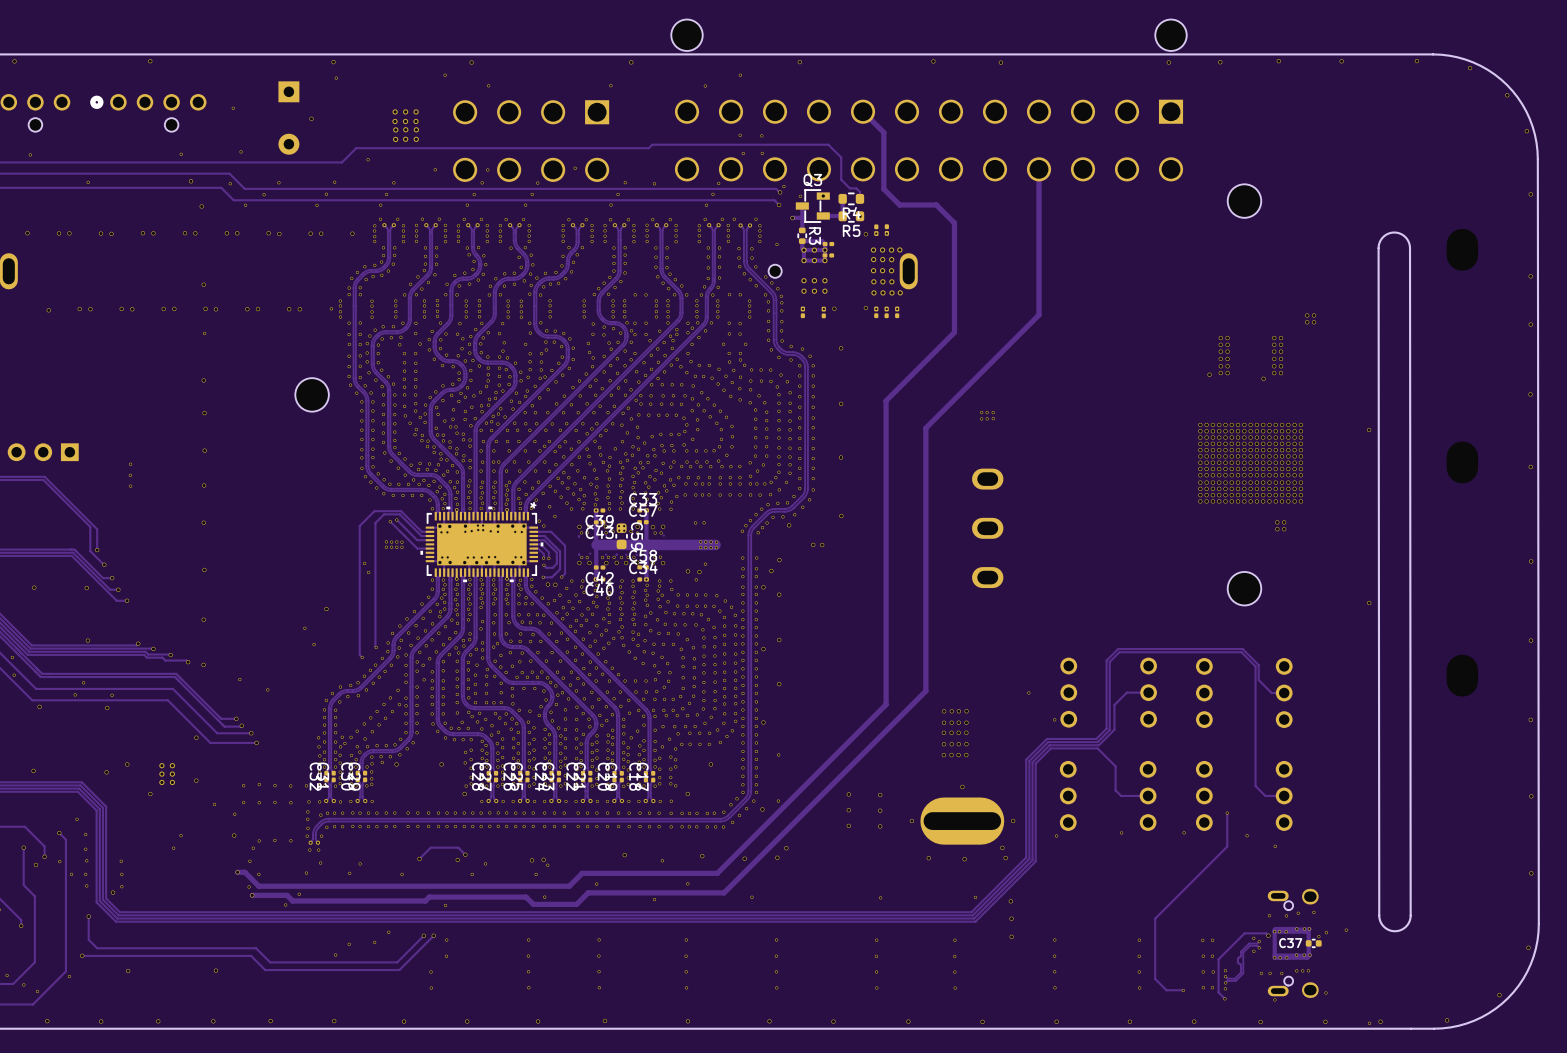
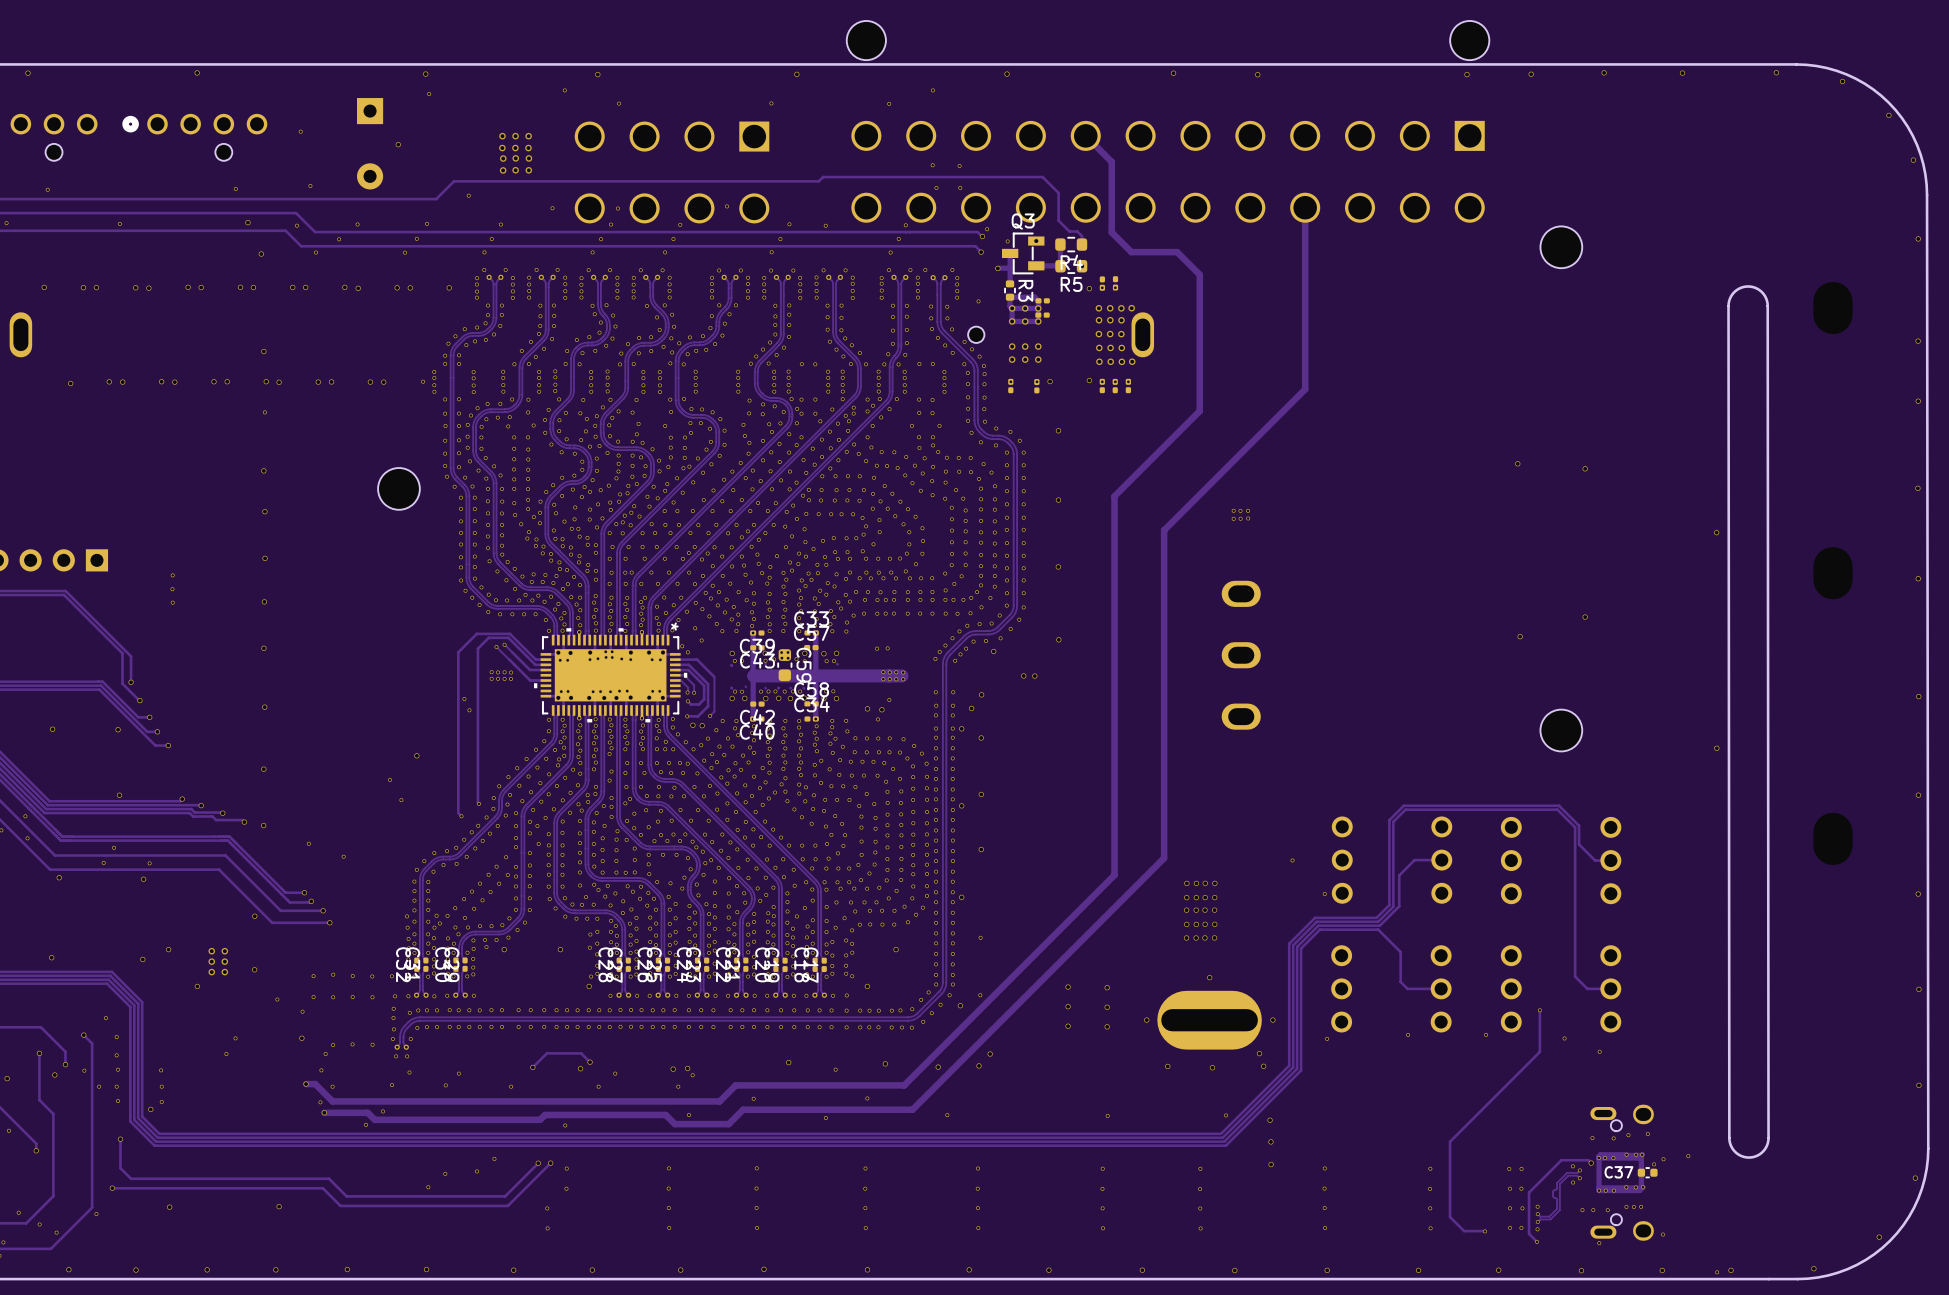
via: (1307, 315) -> none
via: (1314, 315) -> none
via: (1307, 322) -> none
via: (1314, 322) -> none
via: (1220, 338) -> none
via: (1227, 338) -> none
via: (1274, 338) -> none
via: (1281, 338) -> none
via: (1220, 344) -> none
via: (1227, 344) -> none
via: (1274, 344) -> none
via: (1281, 344) -> none
via: (1220, 351) -> none
via: (1227, 351) -> none
via: (1274, 351) -> none
via: (1281, 351) -> none
via: (1220, 358) -> none
via: (1227, 358) -> none
via: (1274, 358) -> none
via: (1281, 358) -> none
via: (1220, 366) -> none
via: (1227, 366) -> none
via: (1274, 366) -> none
via: (1281, 366) -> none
via: (1220, 373) -> none
via: (1227, 373) -> none
via: (1274, 373) -> none
via: (1281, 373) -> none
via: (1200, 424) -> none
via: (1206, 424) -> none
via: (1212, 424) -> none
via: (1219, 424) -> none
via: (1225, 424) -> none
via: (1231, 424) -> none
via: (1238, 424) -> none
via: (1244, 424) -> none
via: (1250, 424) -> none
via: (1256, 424) -> none
via: (1263, 424) -> none
via: (1269, 424) -> none
via: (1275, 424) -> none
via: (1282, 424) -> none
via: (1288, 424) -> none
via: (1294, 424) -> none
via: (1300, 424) -> none
via: (1200, 431) -> none
via: (1206, 431) -> none
via: (1212, 431) -> none
via: (1219, 431) -> none
via: (1225, 431) -> none
via: (1231, 431) -> none
via: (1238, 431) -> none
via: (1244, 431) -> none
via: (1250, 431) -> none
via: (1256, 431) -> none
via: (1263, 431) -> none
via: (1269, 431) -> none
via: (1275, 431) -> none
via: (1282, 431) -> none
via: (1288, 431) -> none
via: (1294, 431) -> none
via: (1300, 431) -> none
via: (1200, 437) -> none
via: (1206, 437) -> none
via: (1212, 437) -> none
via: (1219, 437) -> none
via: (1225, 437) -> none
via: (1231, 437) -> none
via: (1238, 437) -> none
via: (1244, 437) -> none
via: (1250, 437) -> none
via: (1256, 437) -> none
via: (1263, 437) -> none
via: (1269, 437) -> none
via: (1275, 437) -> none
via: (1282, 437) -> none
via: (1288, 437) -> none
via: (1294, 437) -> none
via: (1300, 437) -> none
via: (1200, 443) -> none
via: (1206, 443) -> none
via: (1212, 443) -> none
via: (1219, 443) -> none
via: (1225, 443) -> none
via: (1231, 443) -> none
via: (1238, 443) -> none
via: (1244, 443) -> none
via: (1250, 443) -> none
via: (1256, 443) -> none
via: (1263, 443) -> none
via: (1269, 443) -> none
via: (1275, 443) -> none
via: (1282, 443) -> none
via: (1288, 443) -> none
via: (1294, 443) -> none
via: (1300, 443) -> none
via: (1200, 450) -> none
via: (1206, 450) -> none
via: (1212, 450) -> none
via: (1219, 450) -> none
via: (1225, 450) -> none
via: (1231, 450) -> none
via: (1238, 450) -> none
via: (1244, 450) -> none
via: (1250, 450) -> none
via: (1256, 450) -> none
via: (1263, 450) -> none
via: (1269, 450) -> none
via: (1275, 450) -> none
via: (1282, 450) -> none
via: (1288, 450) -> none
via: (1294, 450) -> none
via: (1300, 450) -> none
via: (1200, 456) -> none
via: (1206, 456) -> none
via: (1212, 456) -> none
via: (1219, 456) -> none
via: (1225, 456) -> none
via: (1231, 456) -> none
via: (1238, 456) -> none
via: (1244, 456) -> none
via: (1250, 456) -> none
via: (1256, 456) -> none
via: (1263, 456) -> none
via: (1269, 456) -> none
via: (1275, 456) -> none
via: (1282, 456) -> none
via: (1288, 456) -> none
via: (1294, 456) -> none
via: (1300, 456) -> none
via: (1200, 462) -> none
via: (1206, 462) -> none
via: (1212, 462) -> none
via: (1219, 462) -> none
via: (1225, 462) -> none
via: (1231, 462) -> none
via: (1238, 462) -> none
via: (1244, 462) -> none
via: (1250, 462) -> none
via: (1256, 462) -> none
via: (1263, 462) -> none
via: (1269, 462) -> none
via: (1275, 462) -> none
via: (1282, 462) -> none
via: (1288, 462) -> none
via: (1294, 462) -> none
via: (1300, 462) -> none
via: (1200, 468) -> none
via: (1206, 468) -> none
via: (1212, 468) -> none
via: (1219, 468) -> none
via: (1225, 468) -> none
via: (1231, 468) -> none
via: (1238, 468) -> none
via: (1244, 468) -> none
via: (1250, 468) -> none
via: (1256, 468) -> none
via: (1263, 468) -> none
via: (1269, 468) -> none
via: (1275, 468) -> none
via: (1282, 468) -> none
via: (1288, 468) -> none
via: (1294, 468) -> none
via: (1300, 468) -> none
via: (1200, 475) -> none
via: (1206, 475) -> none
via: (1212, 475) -> none
via: (1219, 475) -> none
via: (1225, 475) -> none
via: (1231, 475) -> none
via: (1238, 475) -> none
via: (1244, 475) -> none
via: (1250, 475) -> none
via: (1256, 475) -> none
via: (1263, 475) -> none
via: (1269, 475) -> none
via: (1275, 475) -> none
via: (1282, 475) -> none
via: (1288, 475) -> none
via: (1294, 475) -> none
via: (1300, 475) -> none
via: (1200, 482) -> none
via: (1206, 482) -> none
via: (1212, 482) -> none
via: (1219, 482) -> none
via: (1225, 482) -> none
via: (1231, 482) -> none
via: (1238, 482) -> none
via: (1244, 482) -> none
via: (1250, 482) -> none
via: (1256, 482) -> none
via: (1263, 482) -> none
via: (1269, 482) -> none
via: (1275, 482) -> none
via: (1282, 482) -> none
via: (1288, 482) -> none
via: (1294, 482) -> none
via: (1300, 482) -> none
via: (1200, 488) -> none
via: (1206, 488) -> none
via: (1212, 488) -> none
via: (1219, 488) -> none
via: (1225, 488) -> none
via: (1231, 488) -> none
via: (1238, 488) -> none
via: (1244, 488) -> none
via: (1250, 488) -> none
via: (1256, 488) -> none
via: (1263, 488) -> none
via: (1269, 488) -> none
via: (1275, 488) -> none
via: (1282, 488) -> none
via: (1288, 488) -> none
via: (1294, 488) -> none
via: (1300, 488) -> none
via: (1200, 495) -> none
via: (1206, 495) -> none
via: (1212, 495) -> none
via: (1219, 495) -> none
via: (1225, 495) -> none
via: (1231, 495) -> none
via: (1238, 495) -> none
via: (1244, 495) -> none
via: (1250, 495) -> none
via: (1256, 495) -> none
via: (1263, 495) -> none
via: (1269, 495) -> none
via: (1275, 495) -> none
via: (1282, 495) -> none
via: (1288, 495) -> none
via: (1294, 495) -> none
via: (1300, 495) -> none
via: none -> (1585, 617)
via: (1200, 501) -> none
via: (1206, 501) -> none
via: (1212, 501) -> none
via: (1219, 501) -> none
via: (1225, 501) -> none
via: (1231, 501) -> none
via: (1238, 501) -> none
via: (1244, 501) -> none
via: (1250, 501) -> none
via: (1256, 501) -> none
via: (1263, 501) -> none
via: (1269, 501) -> none
via: (1275, 501) -> none
via: (1282, 501) -> none
via: (1288, 501) -> none
via: (1294, 501) -> none
via: (1300, 501) -> none
via: none -> (1520, 636)
via: (1277, 522) -> none
via: (1284, 522) -> none
via: (1277, 529) -> none
via: (1284, 529) -> none

